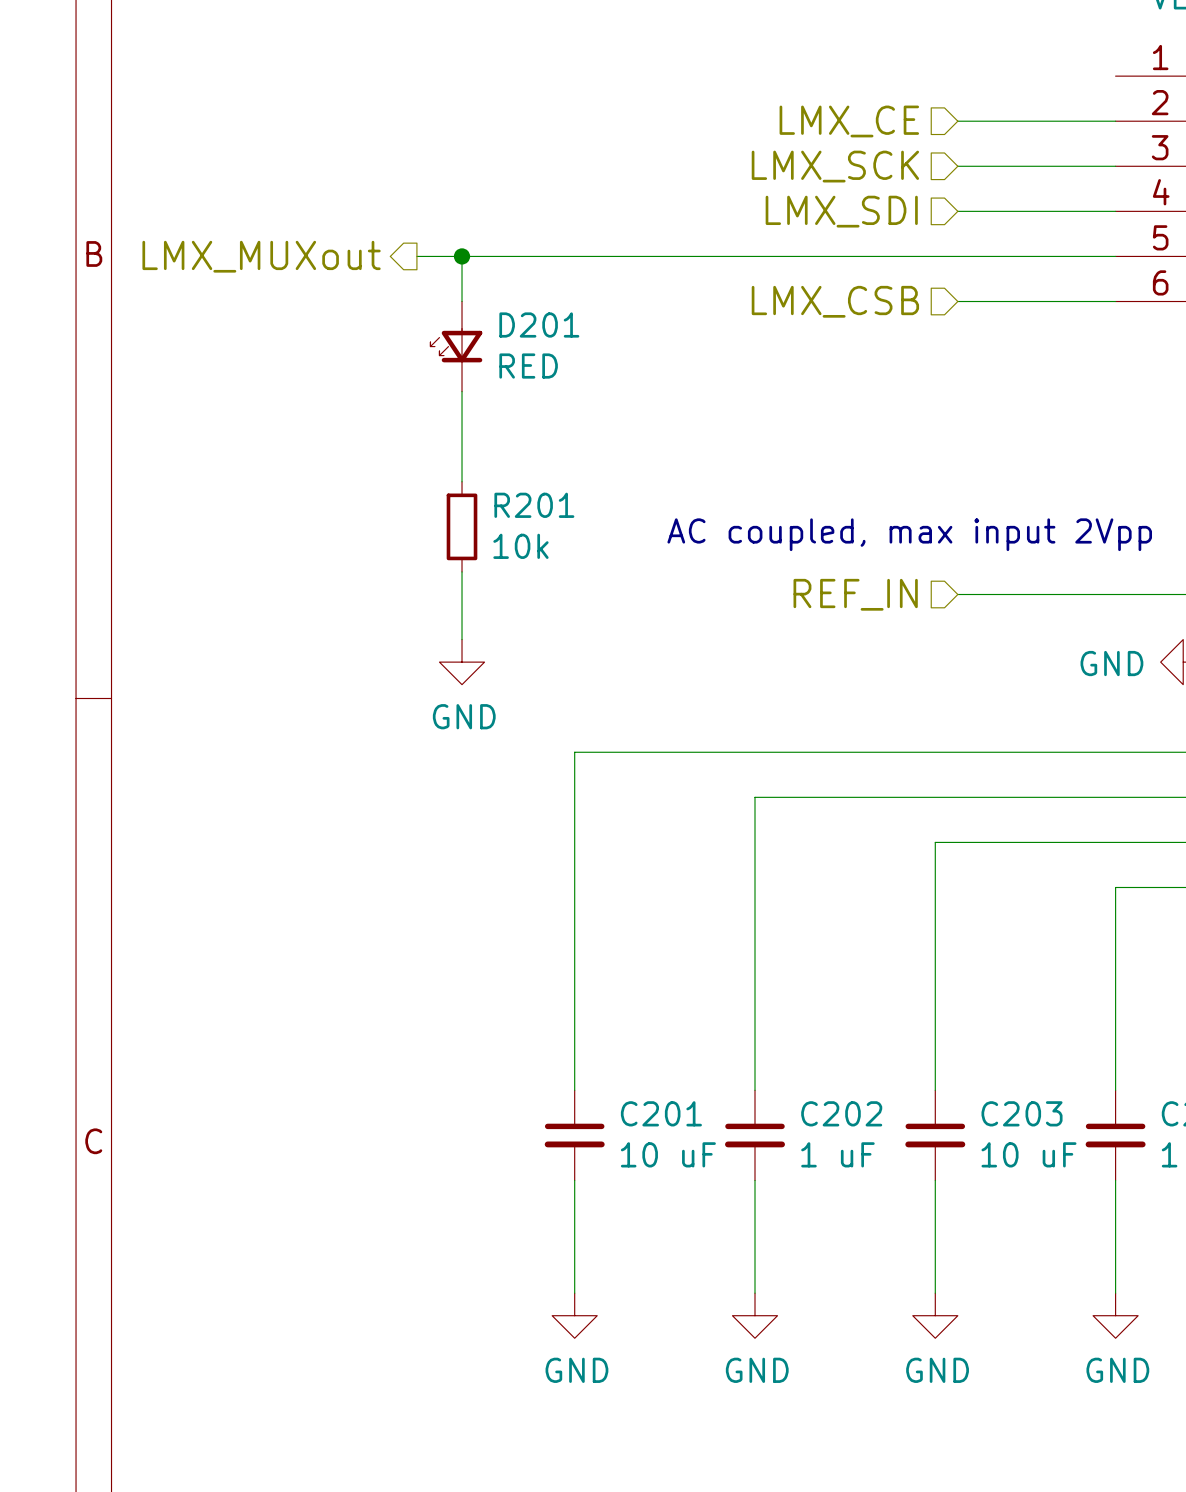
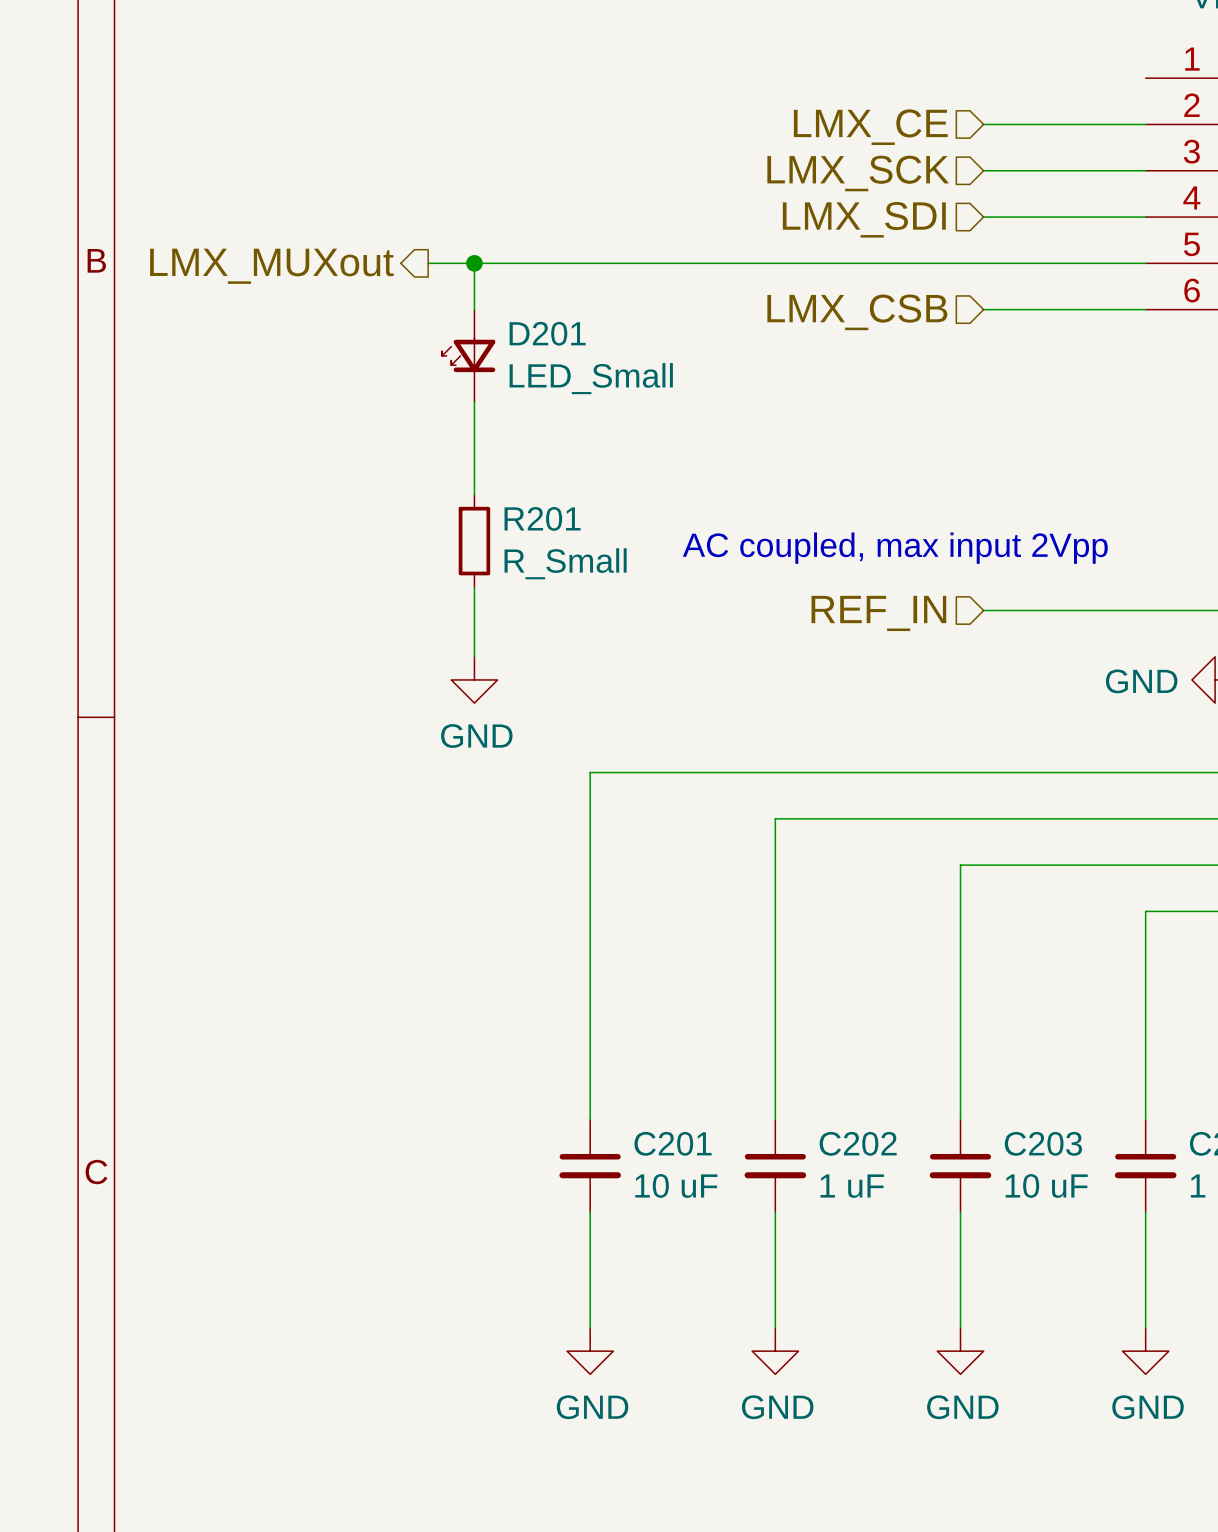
D201 value: RED (528, 366) -> LED_Small (591, 378)
R201 value: 10k (520, 546) -> R_Small (565, 563)

